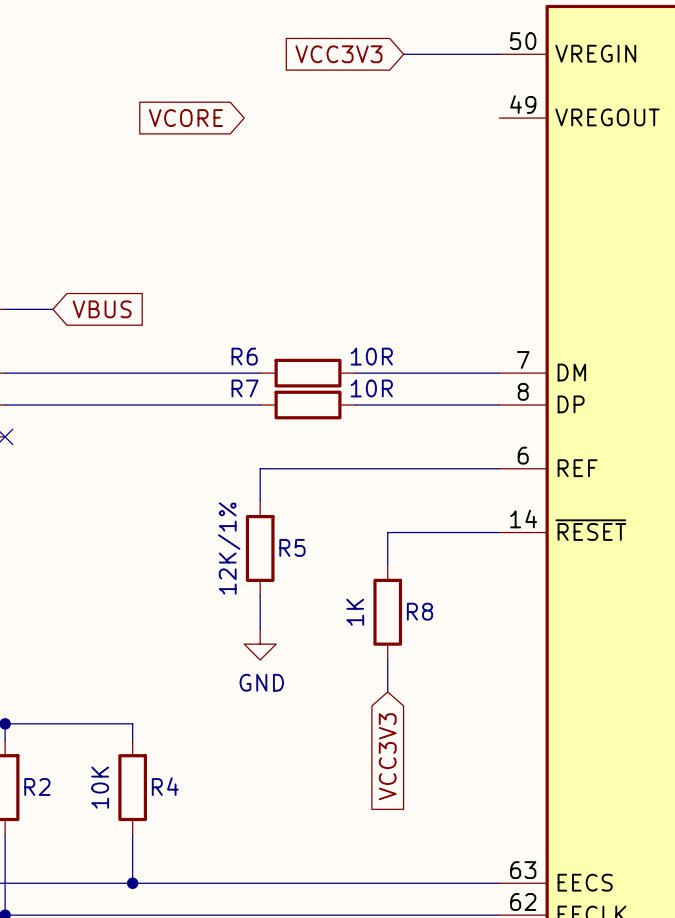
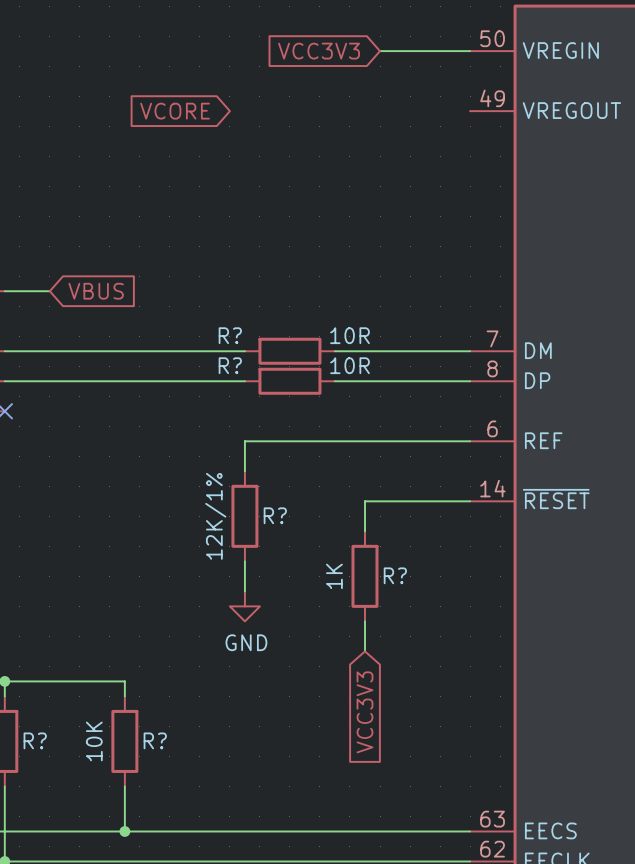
R6 name: R6 (244, 356) -> R? (230, 335)
R7 name: R7 (245, 388) -> R? (230, 365)
R5 name: R5 (292, 547) -> R? (275, 515)
R8 name: R8 (419, 611) -> R? (395, 575)
R4 name: R4 (165, 786) -> R? (155, 740)
R2 name: R2 (37, 787) -> R? (35, 740)

